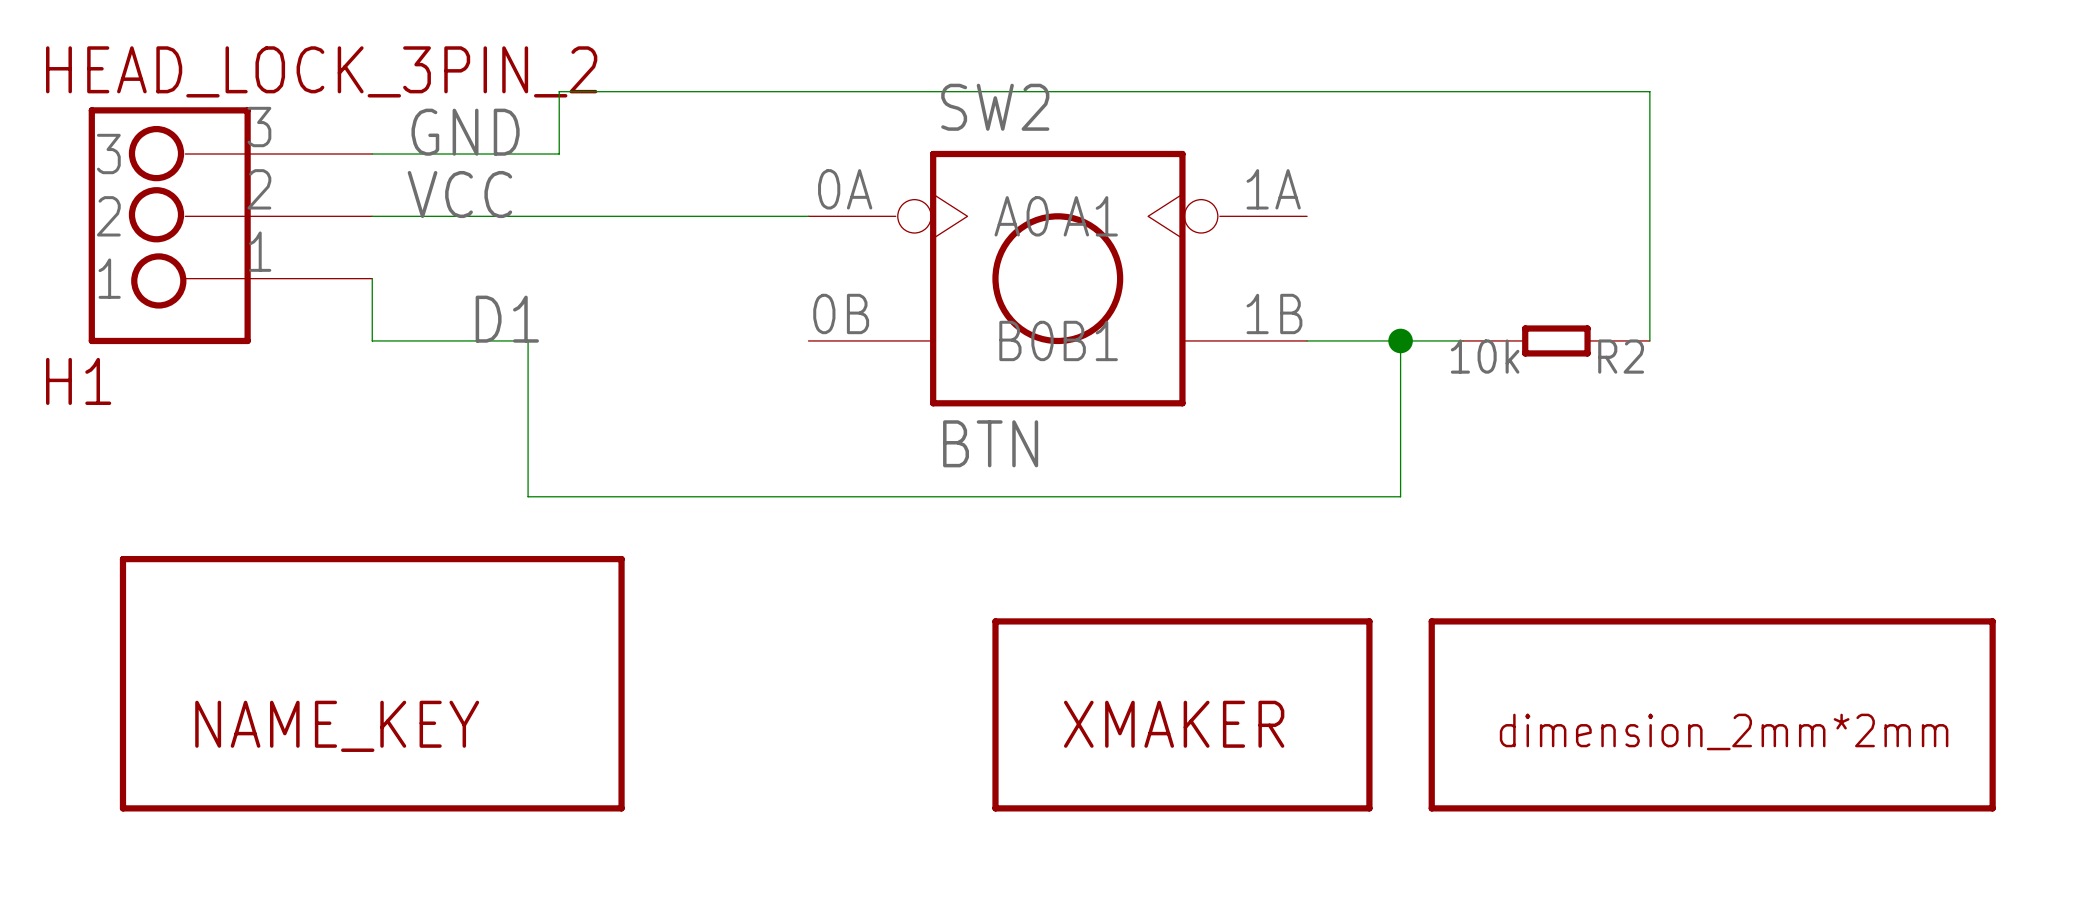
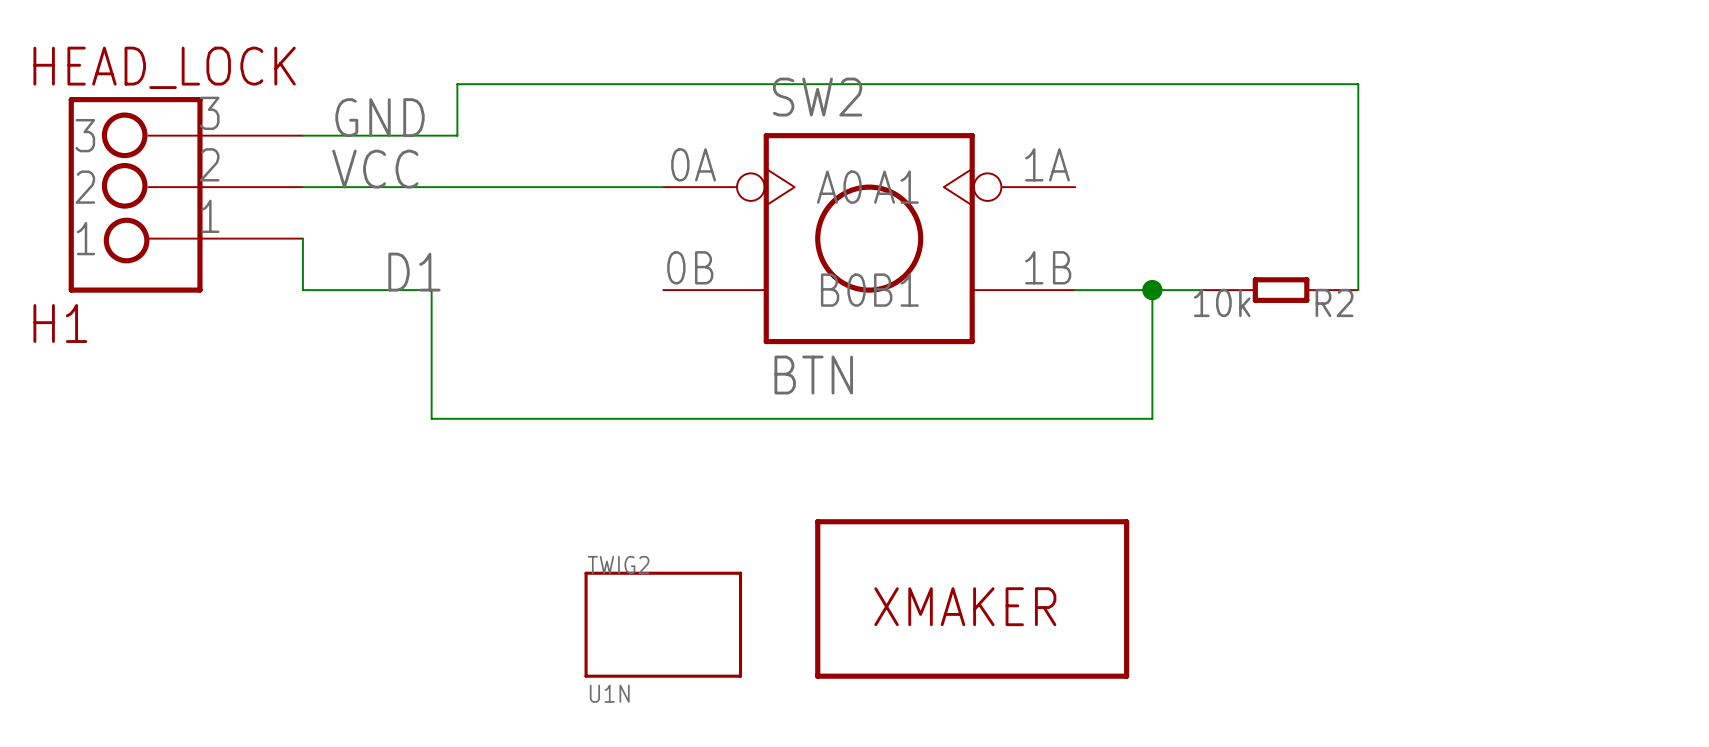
H1 value: HEAD_LOCK_3PIN_2 (321, 71) -> HEAD_LOCK (164, 67)
part: (372, 683) -> none
part: (1712, 714) -> none
TWIG2: none -> U1N (663, 624)

